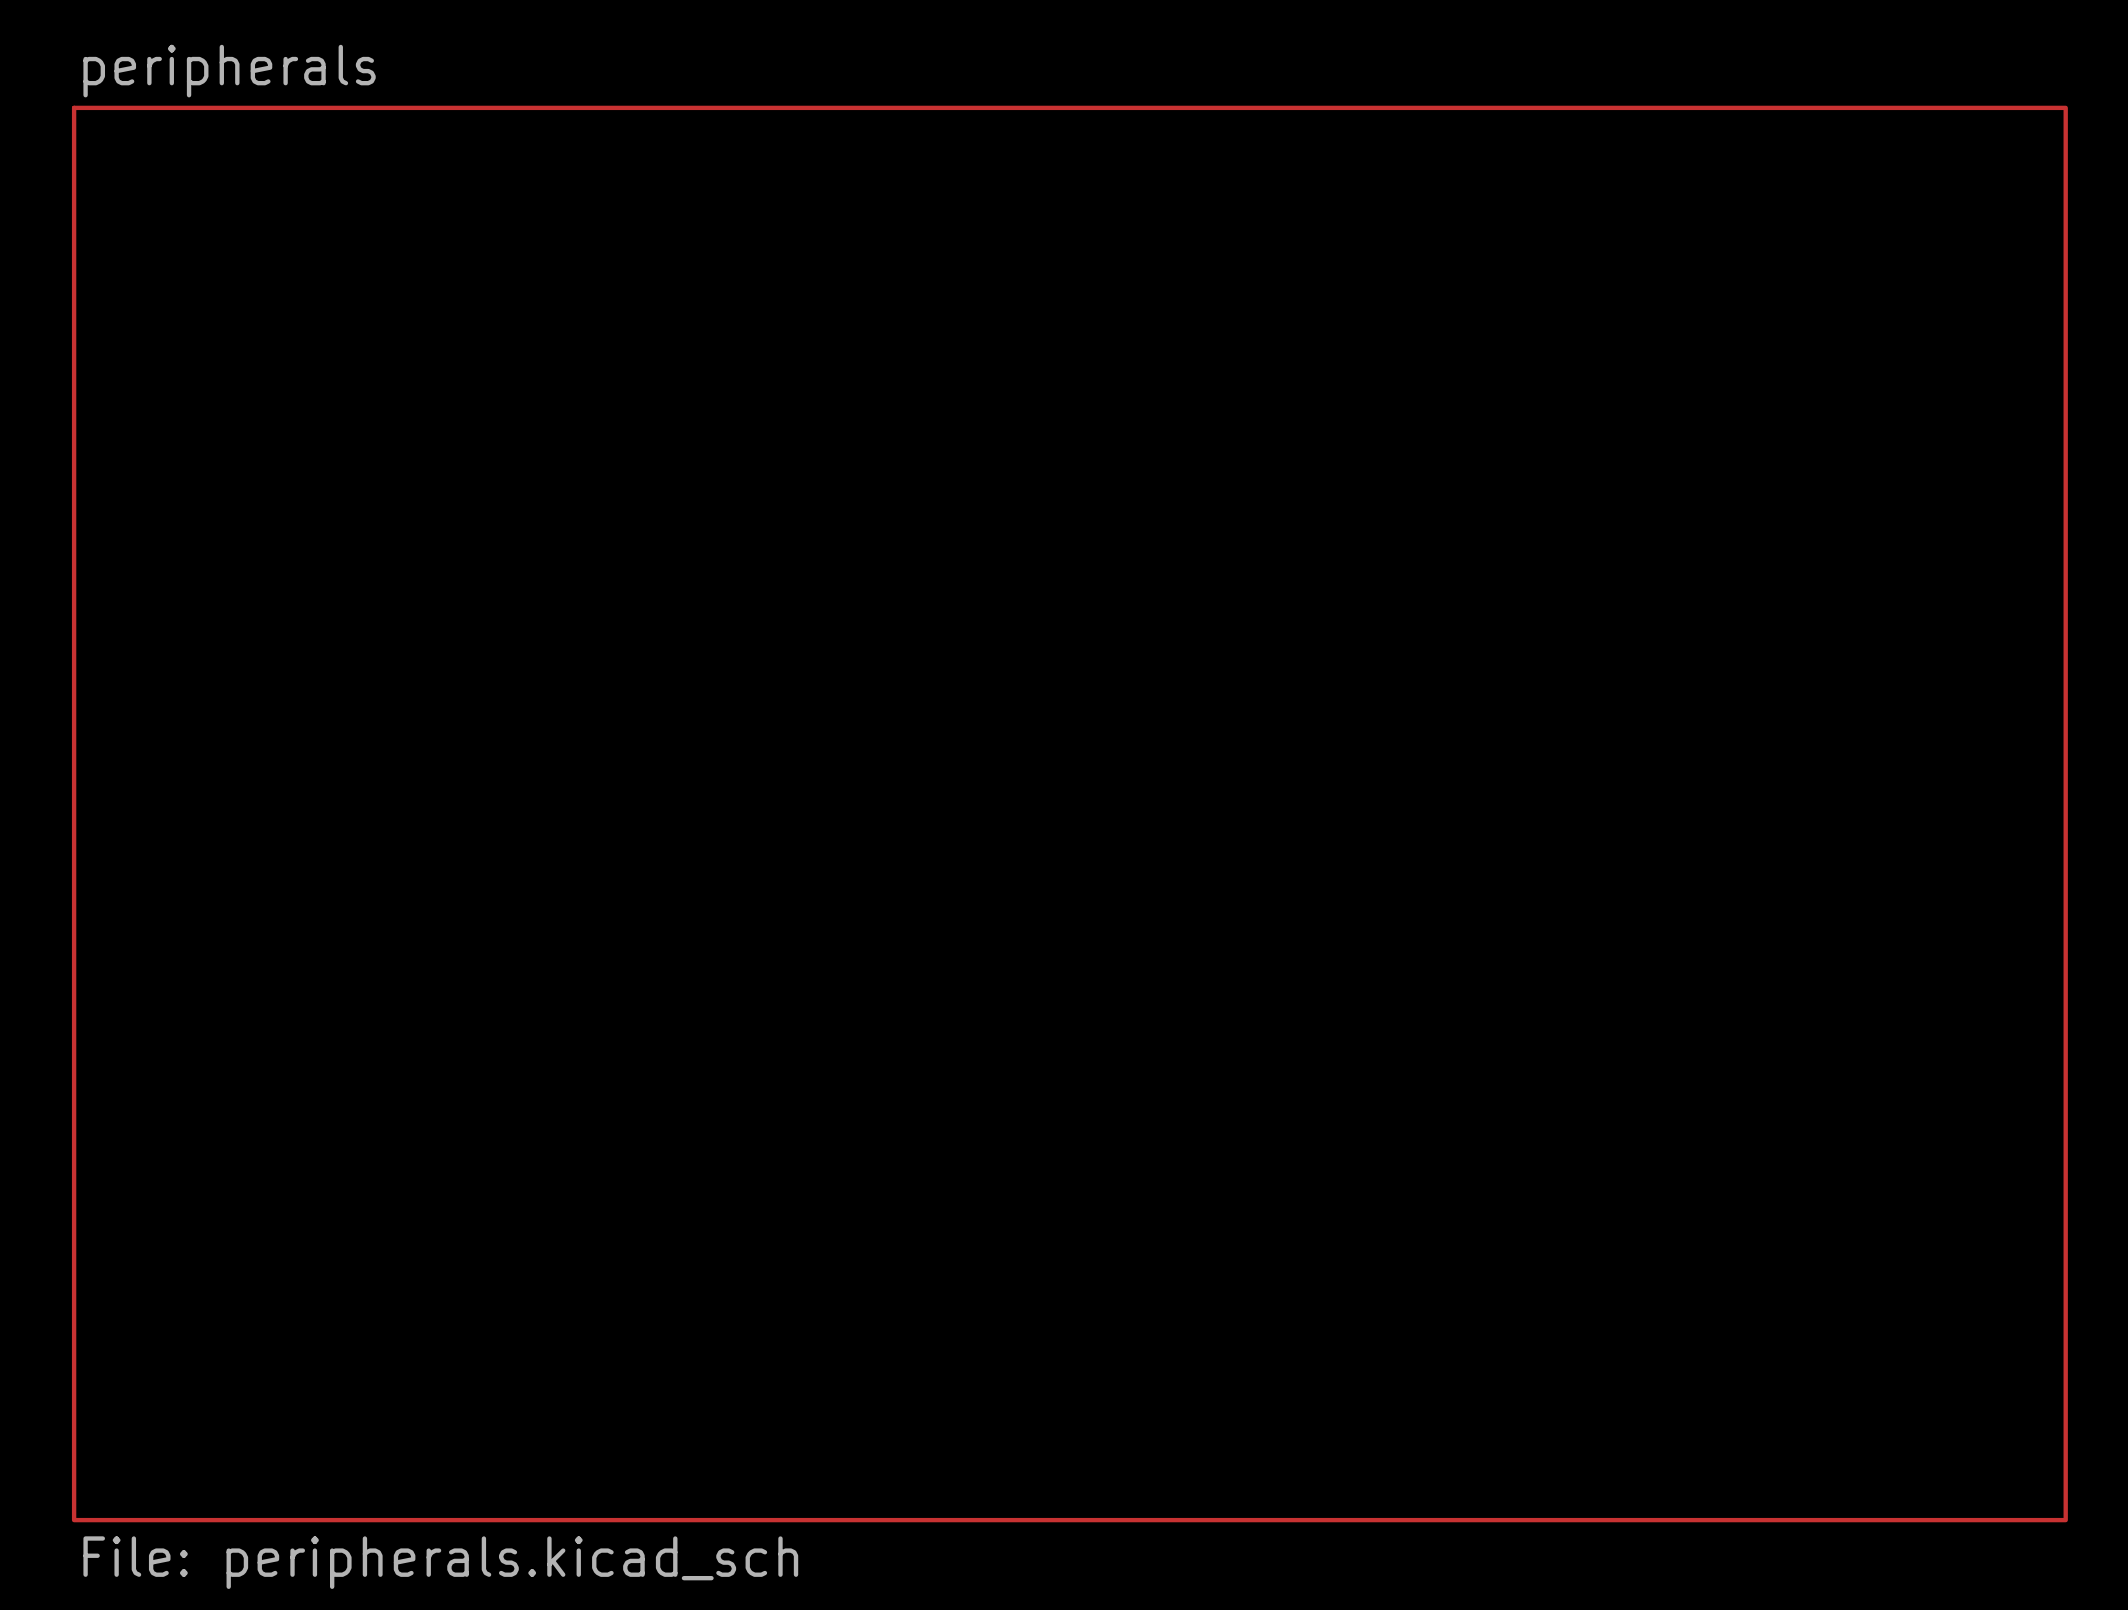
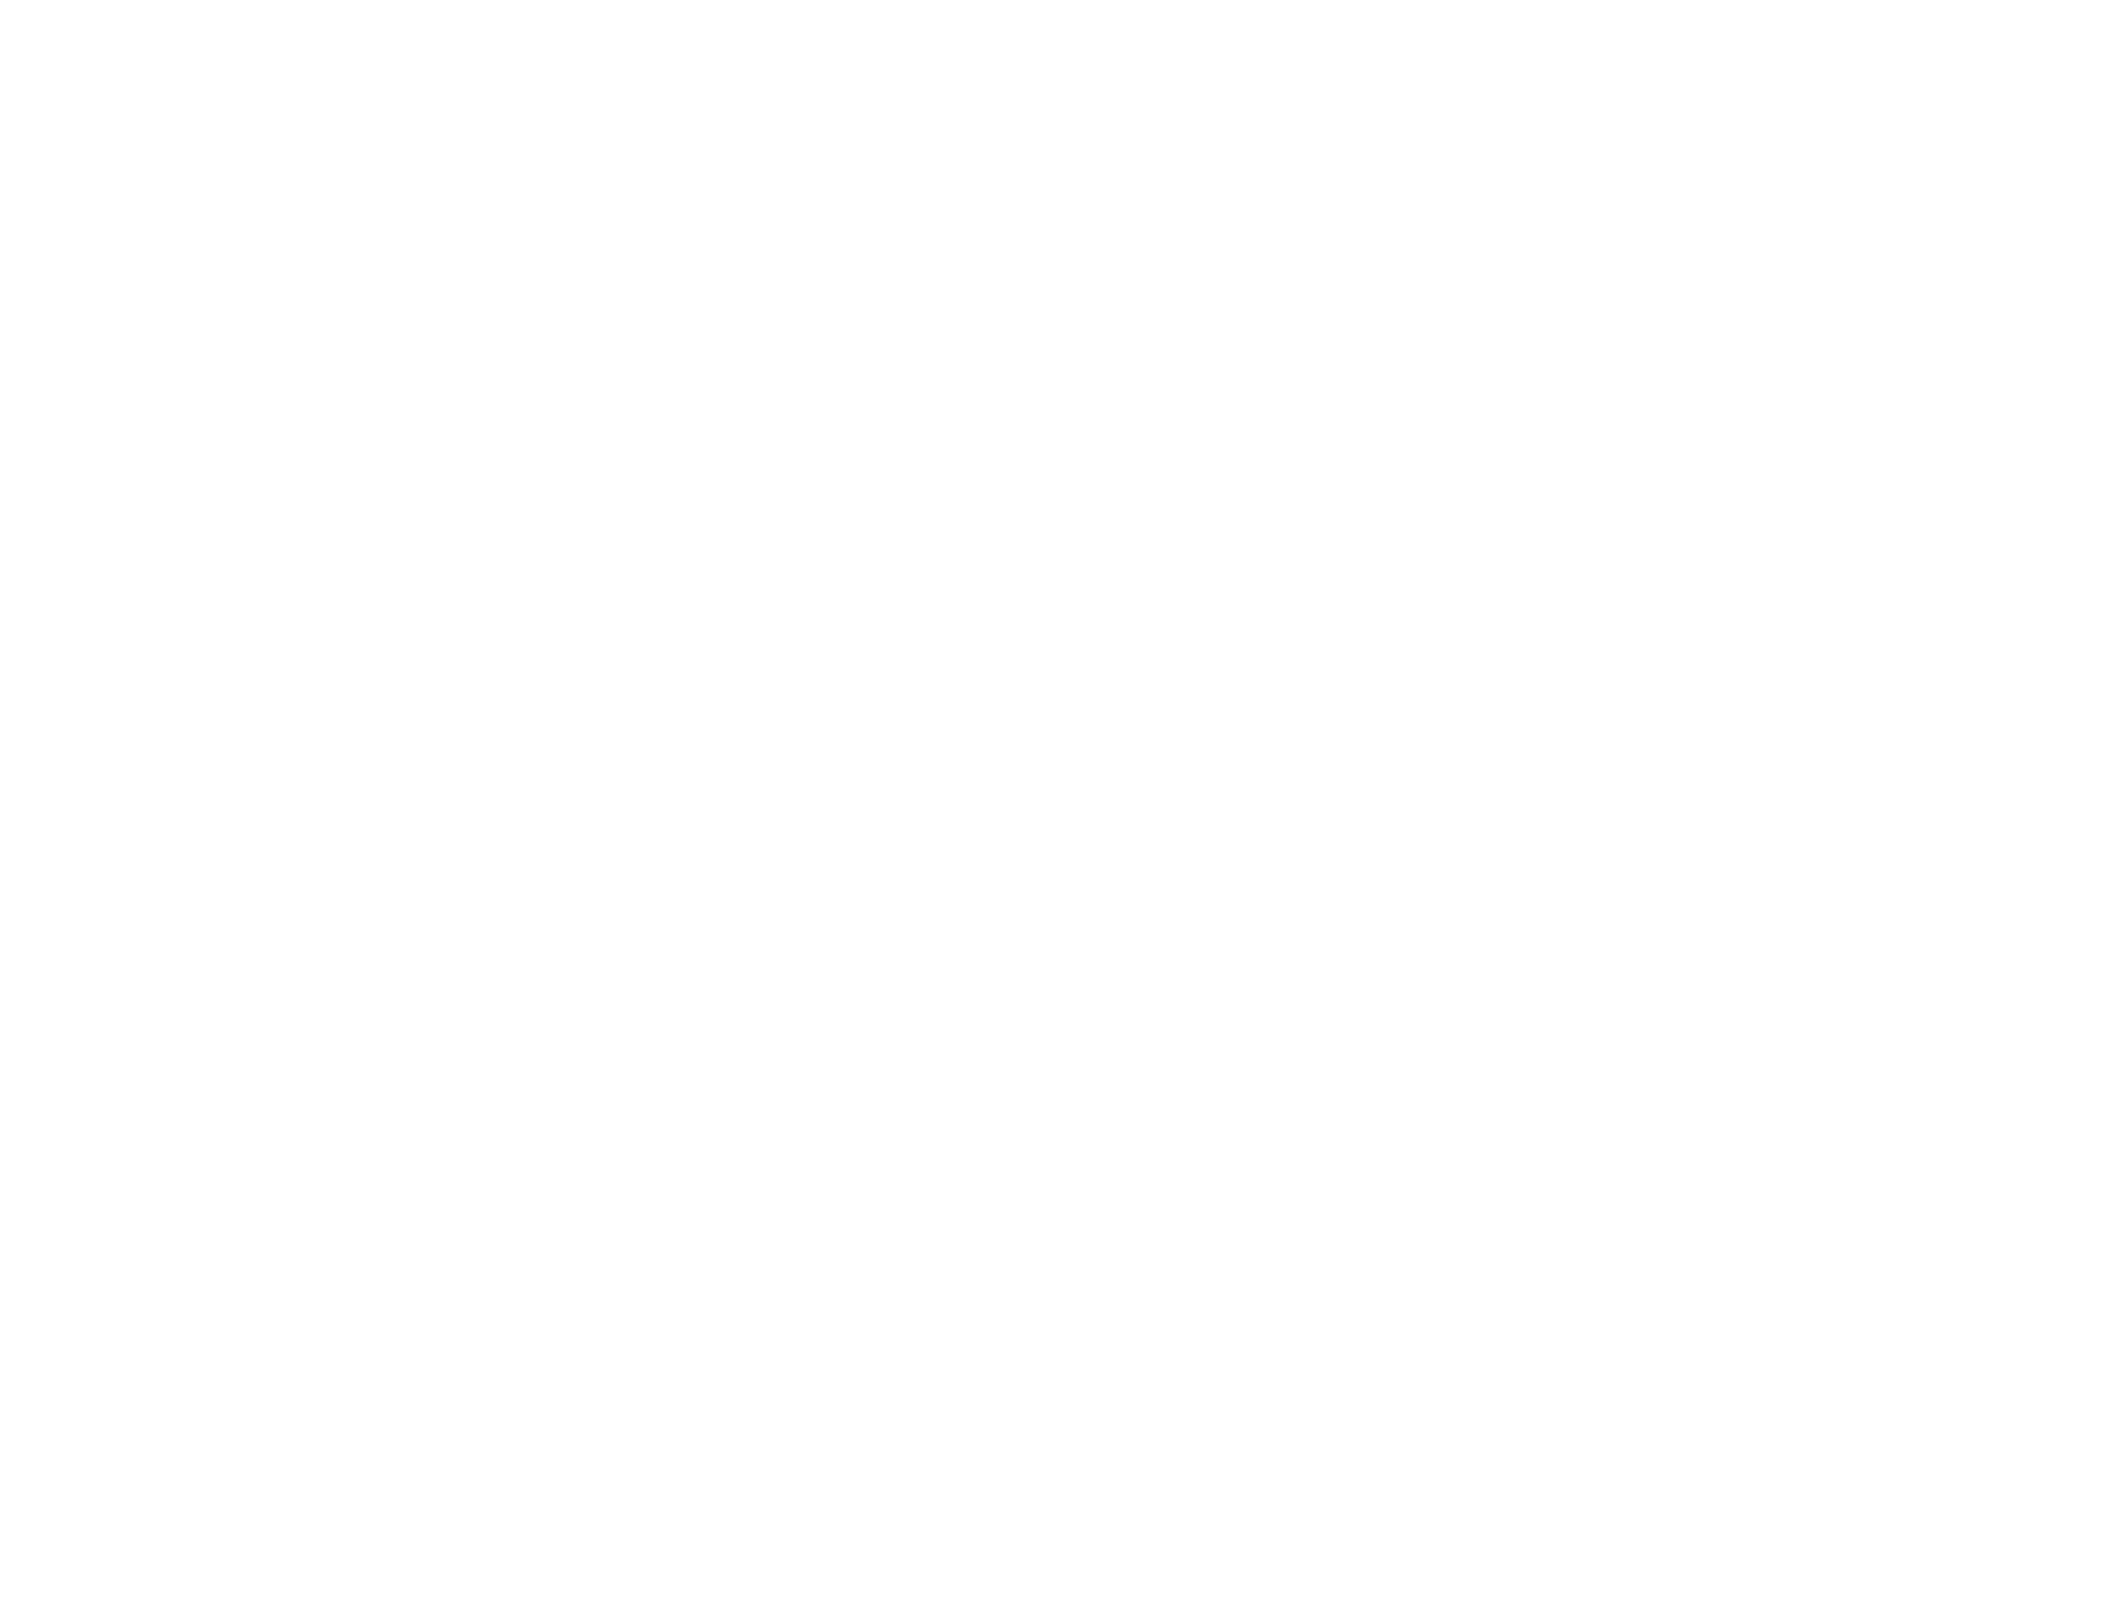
sheet peripherals: File: peripherals.kicad_sch (1069, 813) -> none

